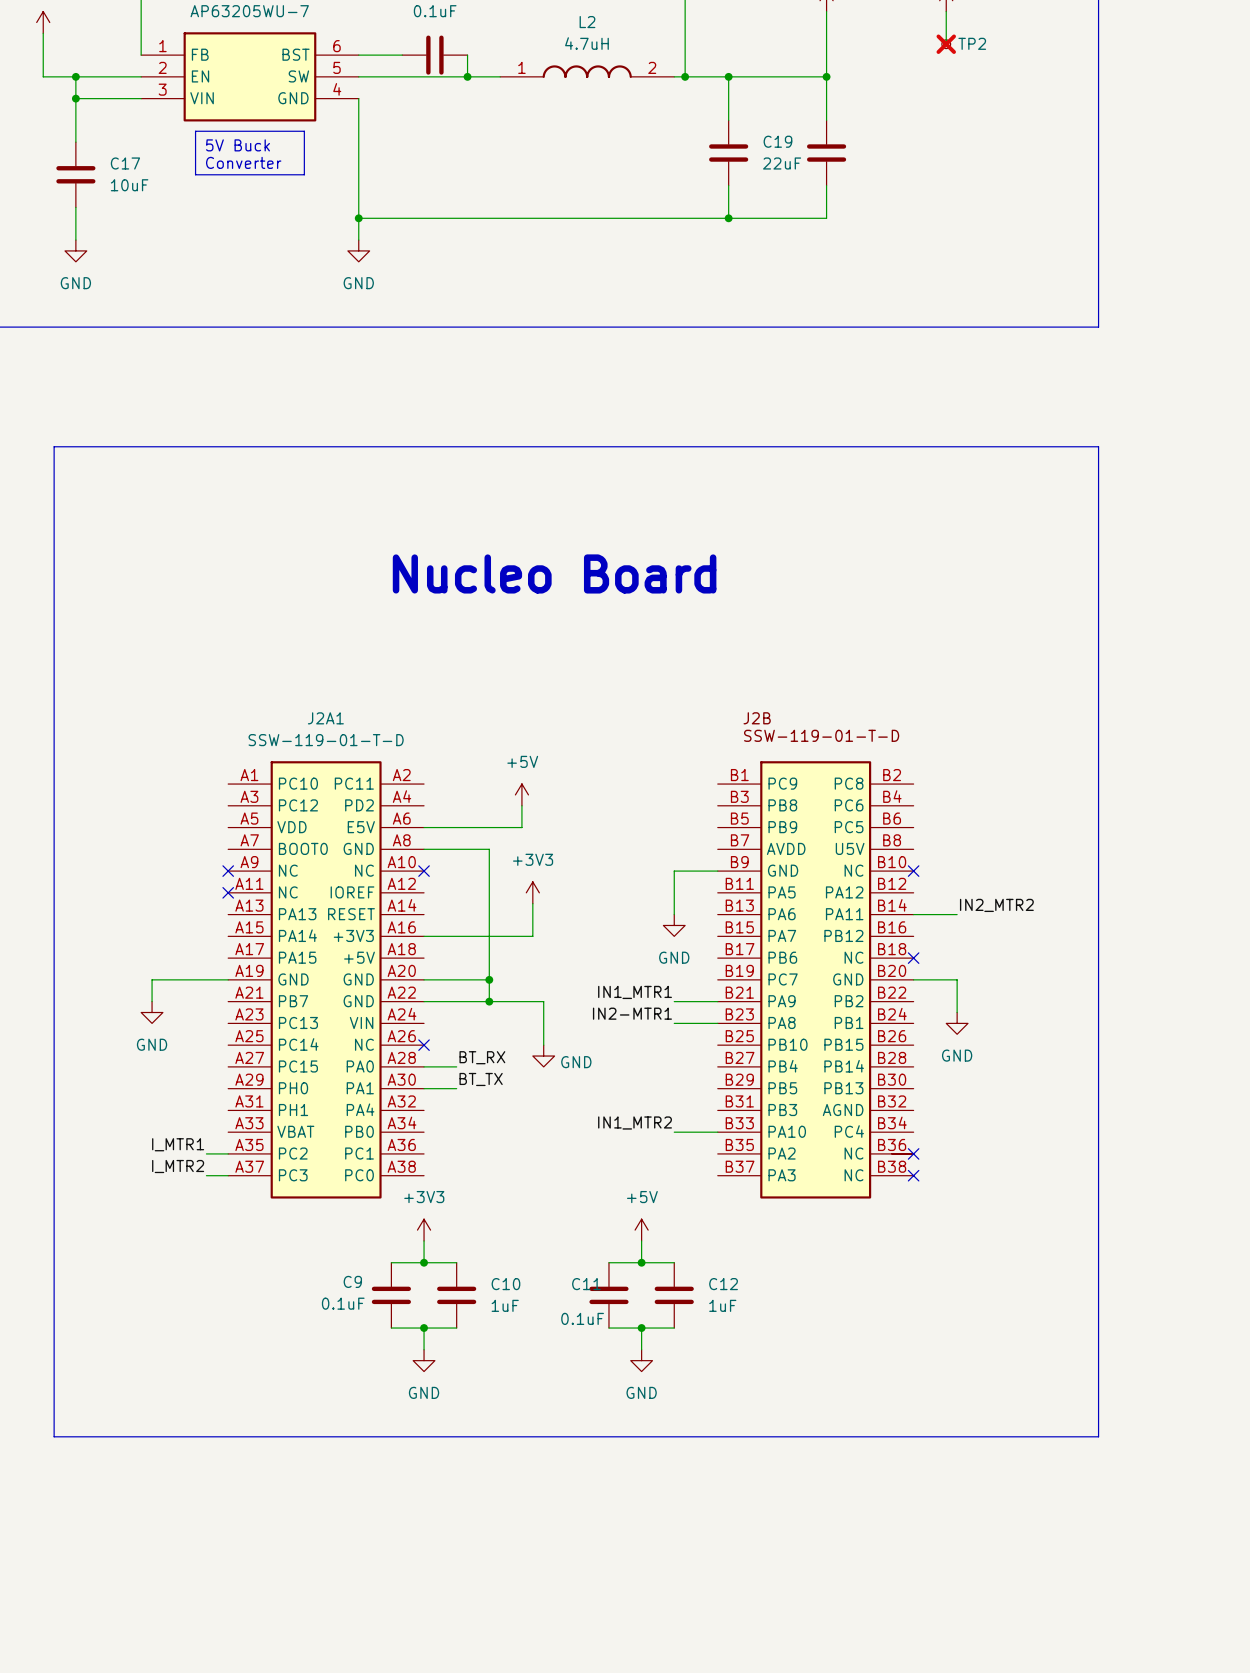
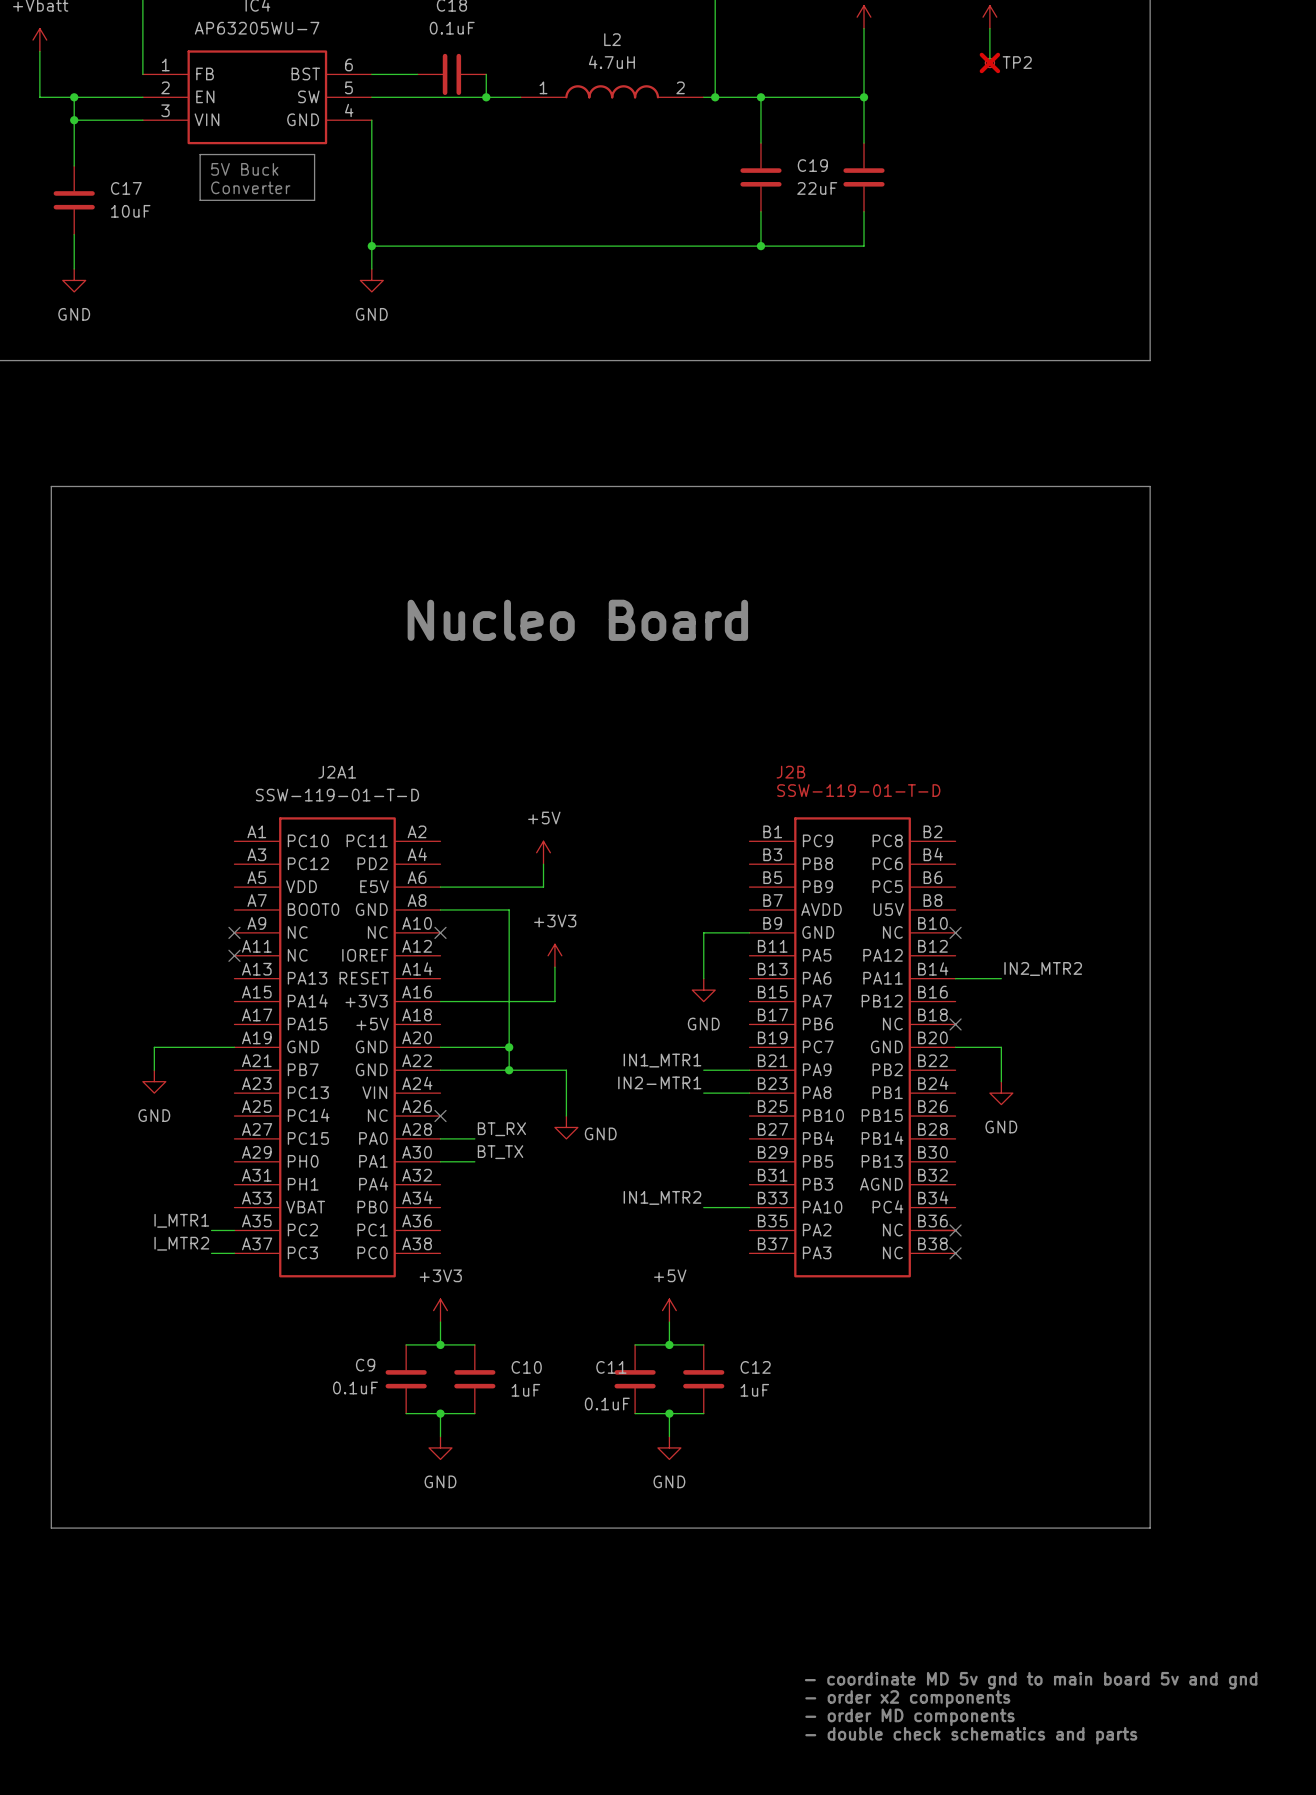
text: none -> - coordinate MD 5v gnd to main board 5v and gnd (1031, 1680)
text: none -> - order x2 components (907, 1698)
text: none -> - order MD components (909, 1717)
text: none -> - double check schematics and parts (971, 1735)

